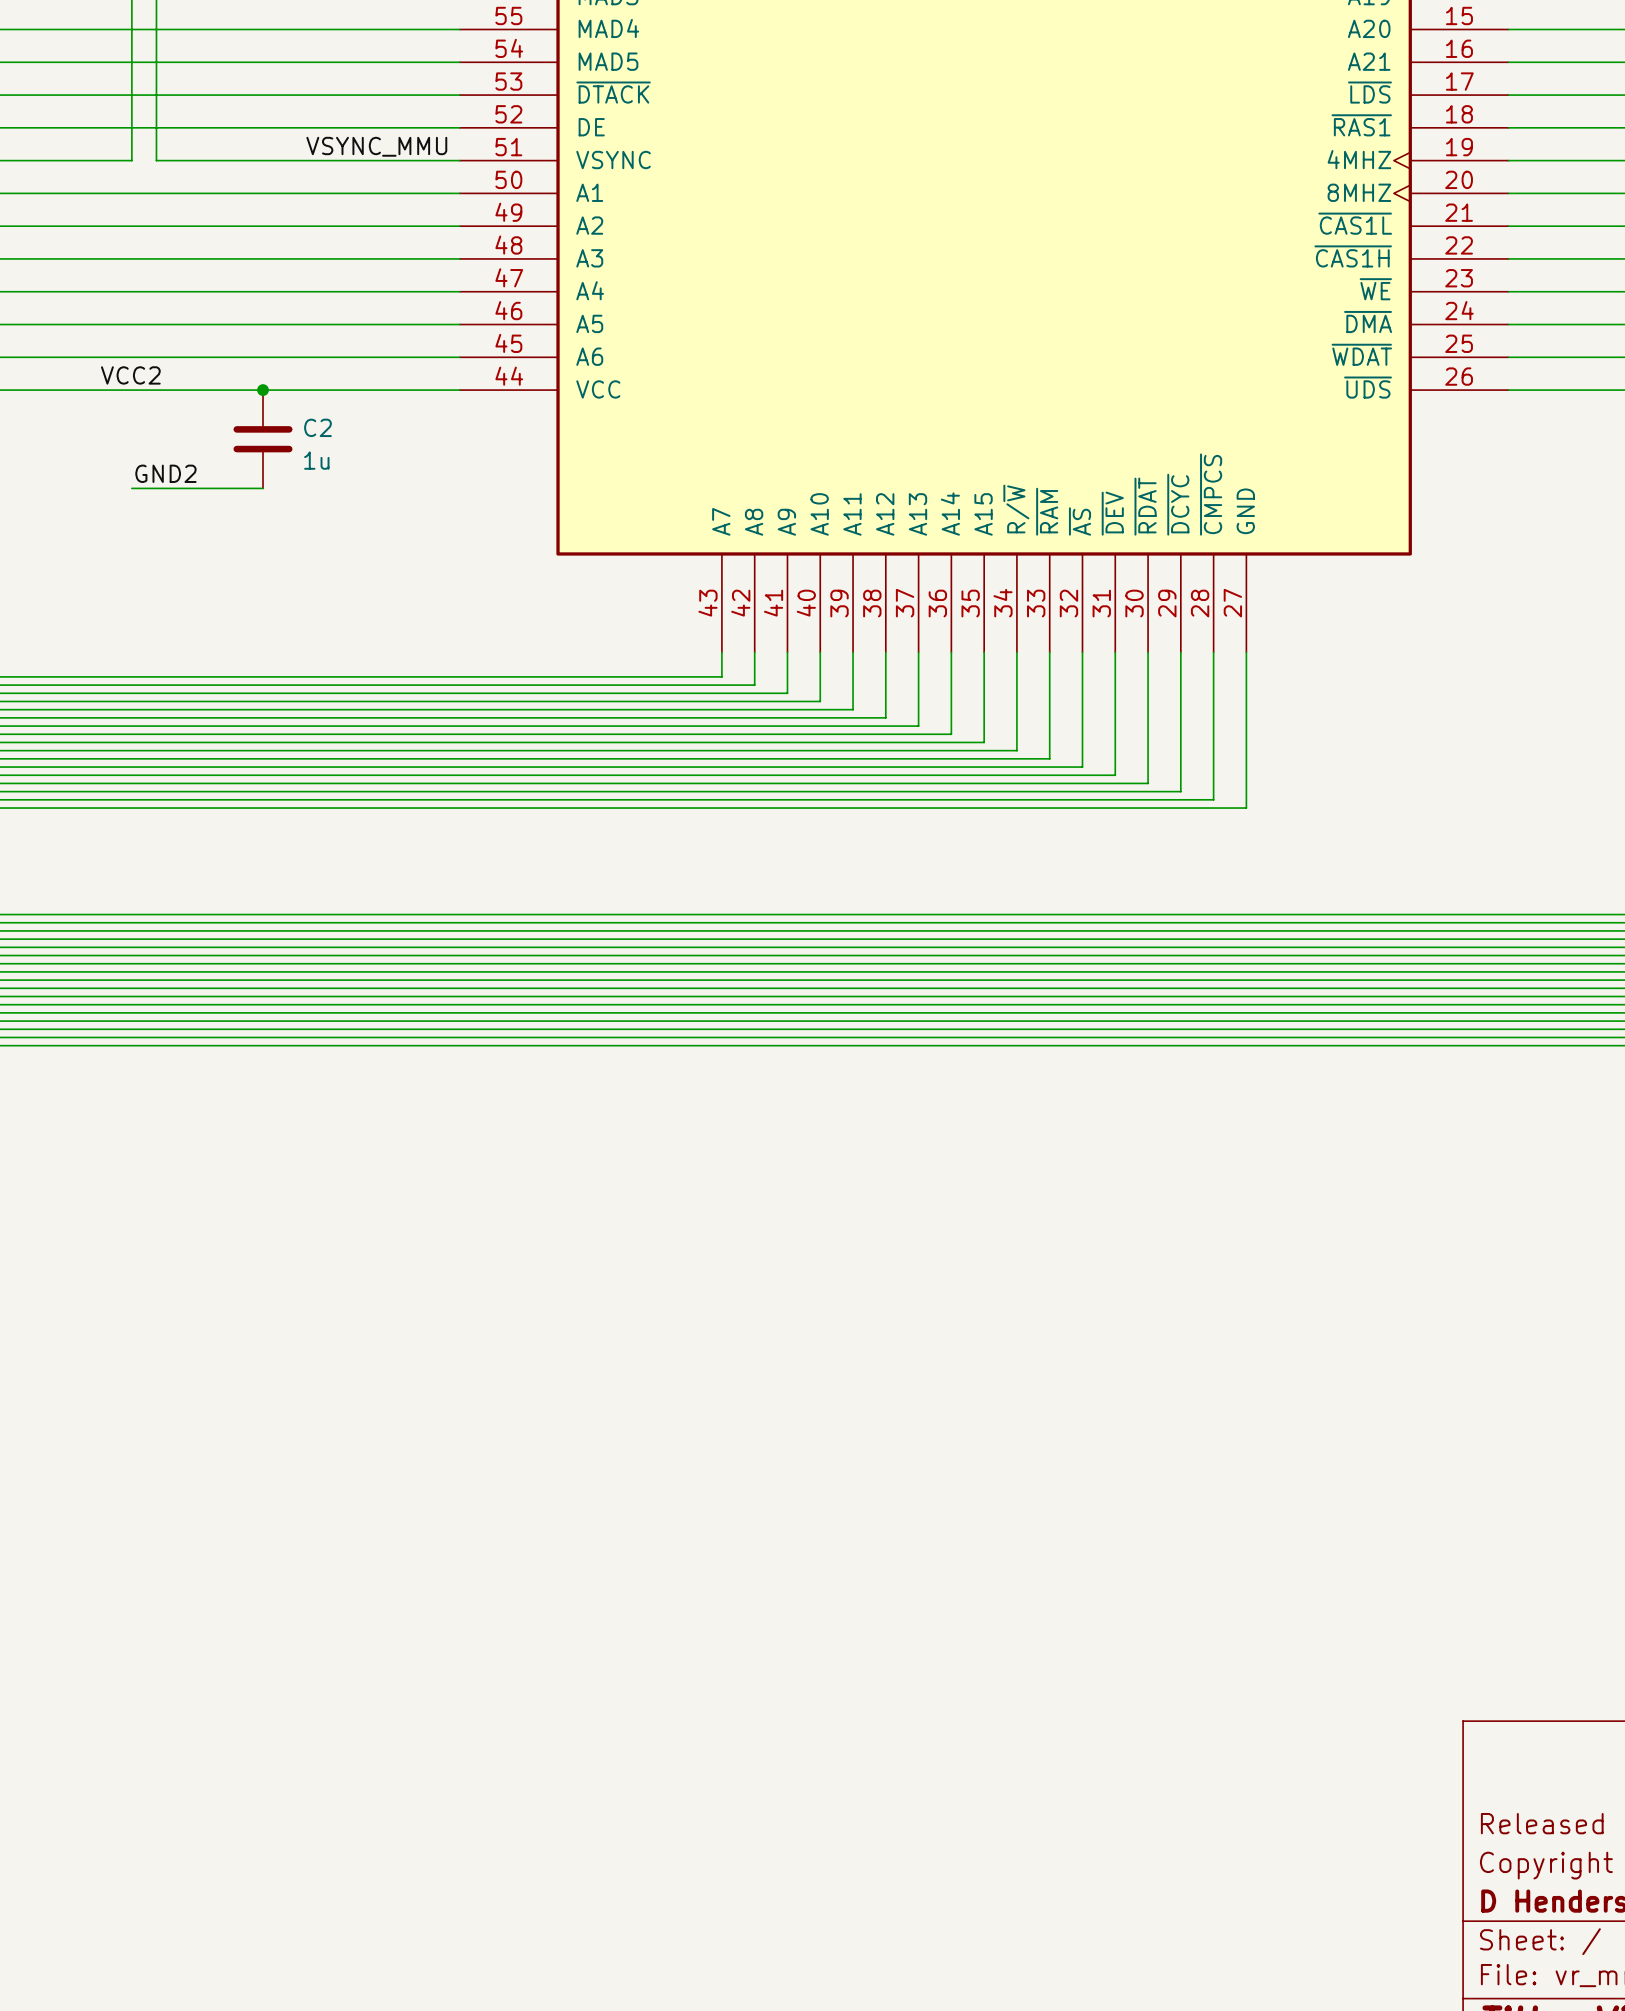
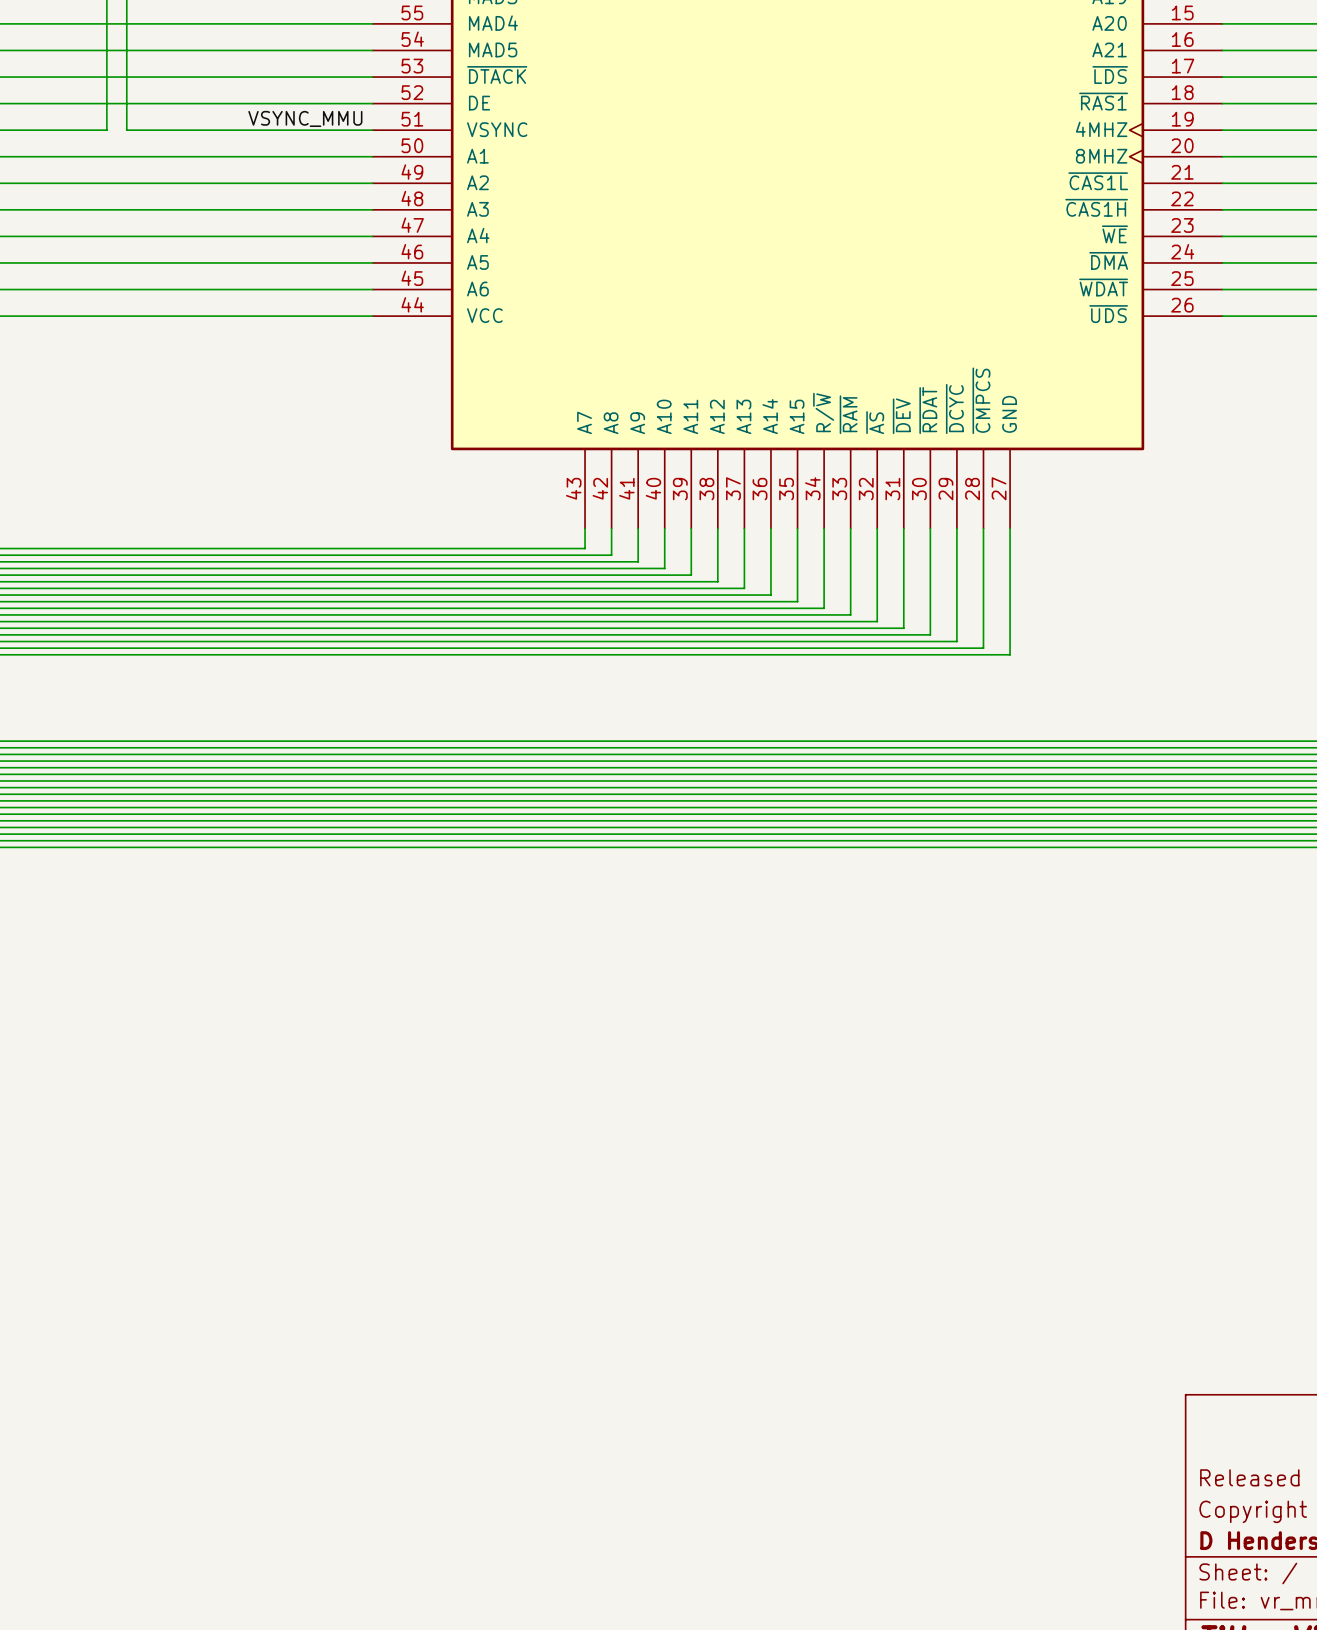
label: VCC2 (130, 375) -> none
junction: (263, 390) -> none
C2: 1u (263, 439) -> none
label: GND2 (165, 473) -> none
wire: (131, 488) (263, 488) -> none

